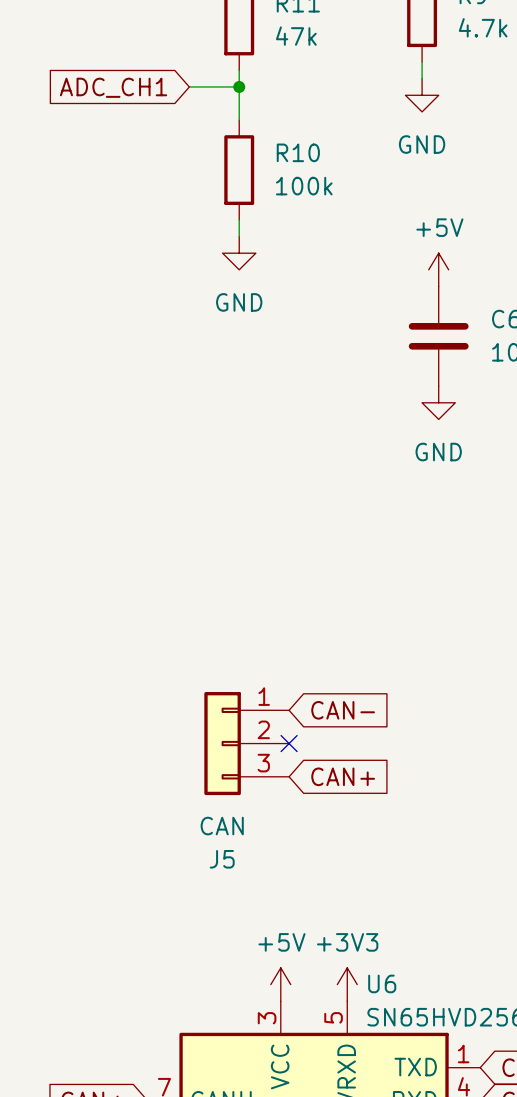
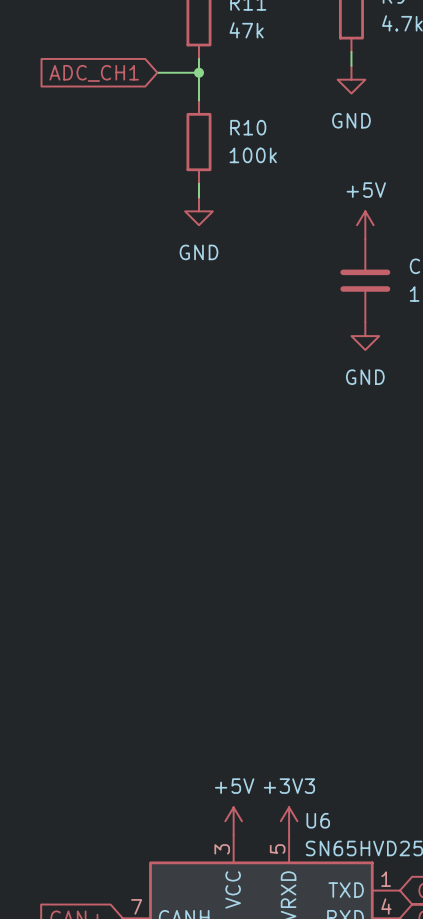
global label: CAN- (343, 710) -> none
J5: CAN (246, 743) -> none
no-connect mark: (289, 743) -> none
global label: CAN+ (343, 776) -> none

